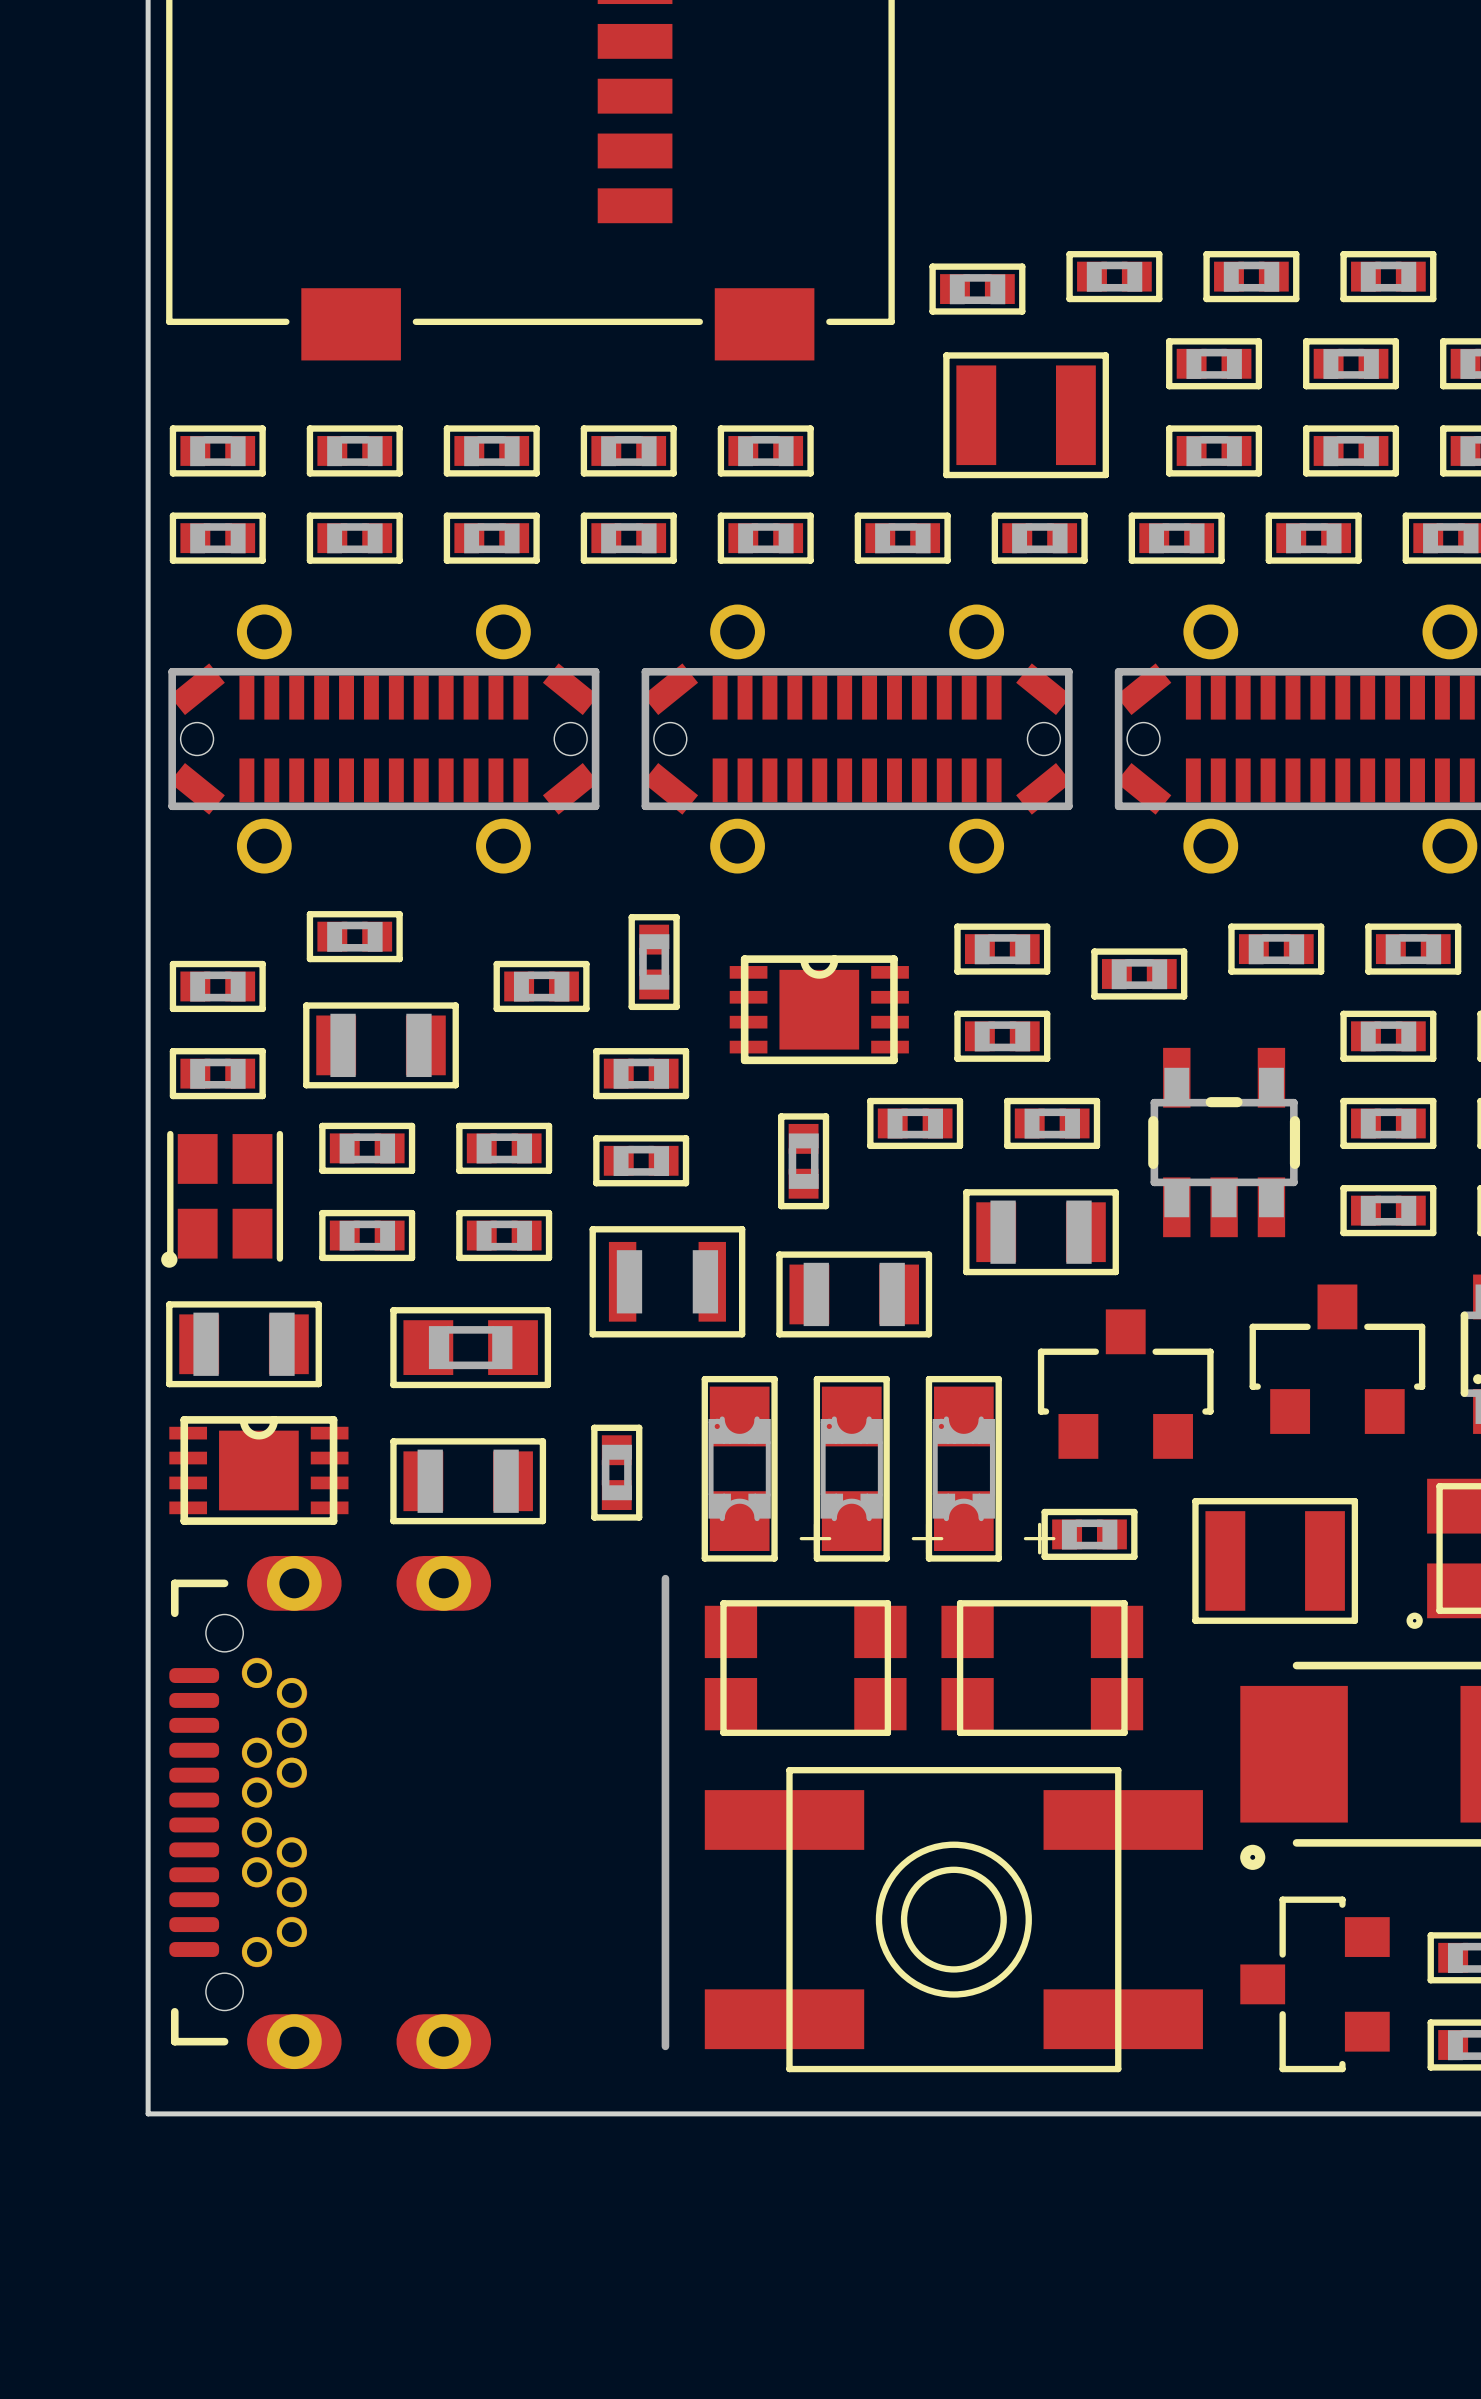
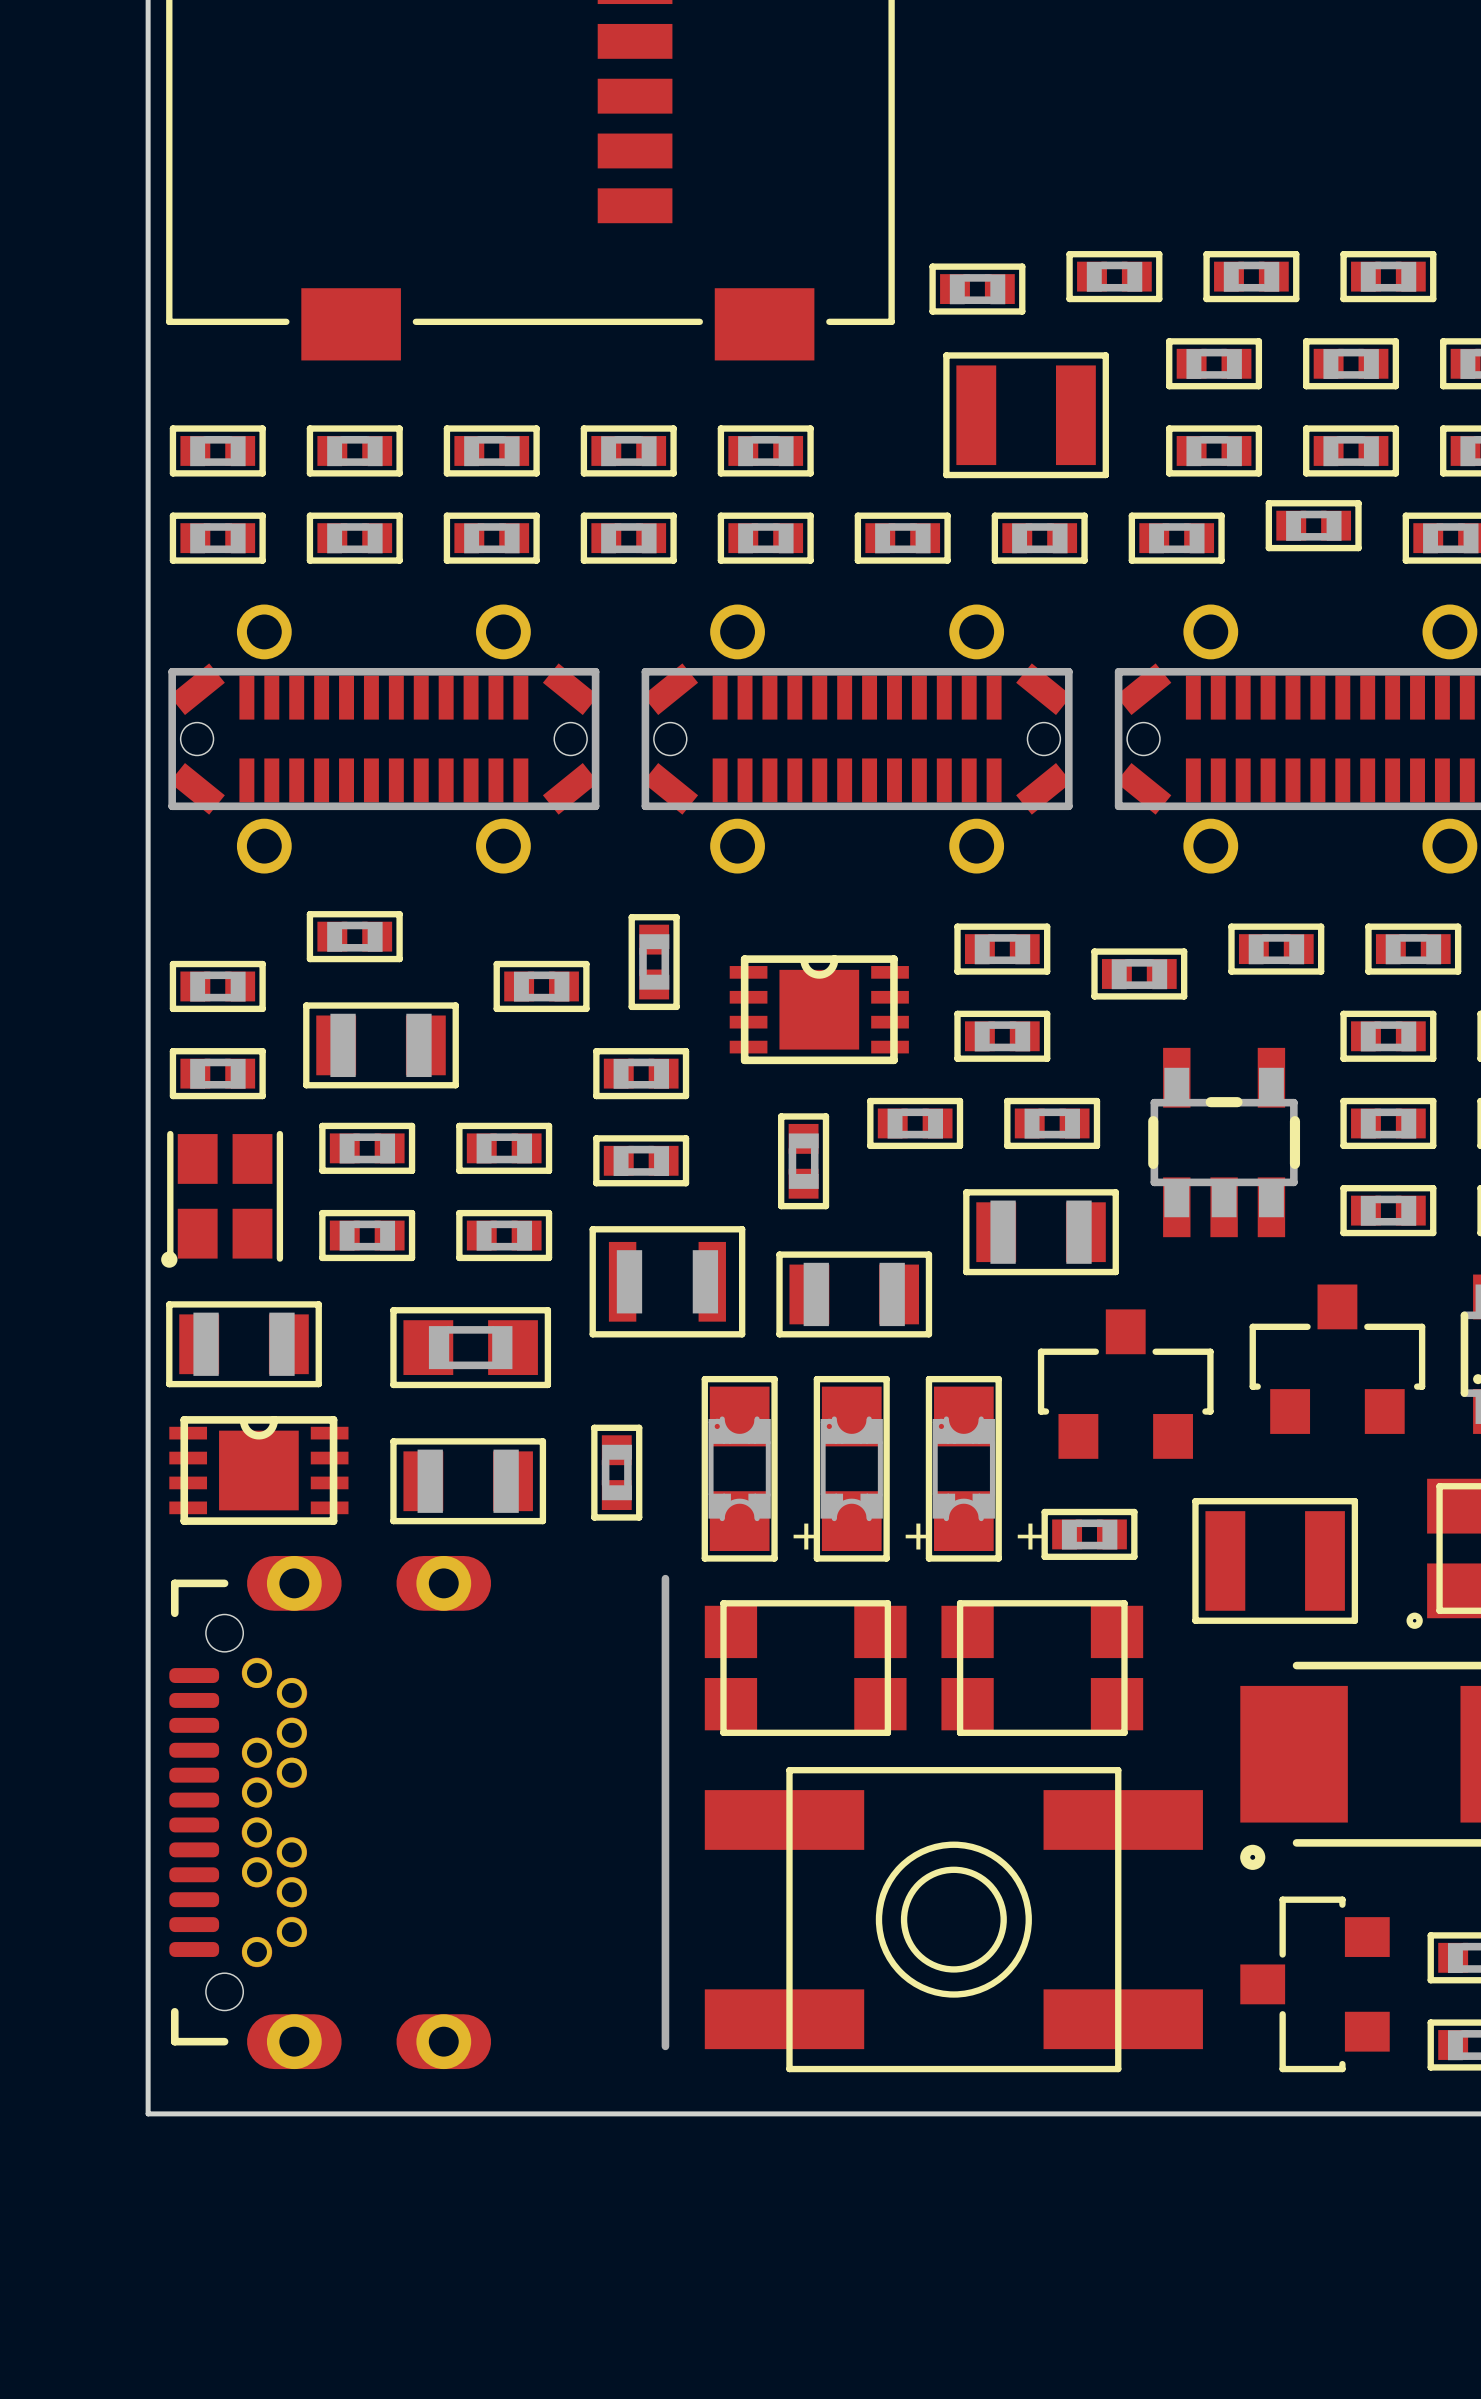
part position: (1313, 538) -> (1313, 525)

